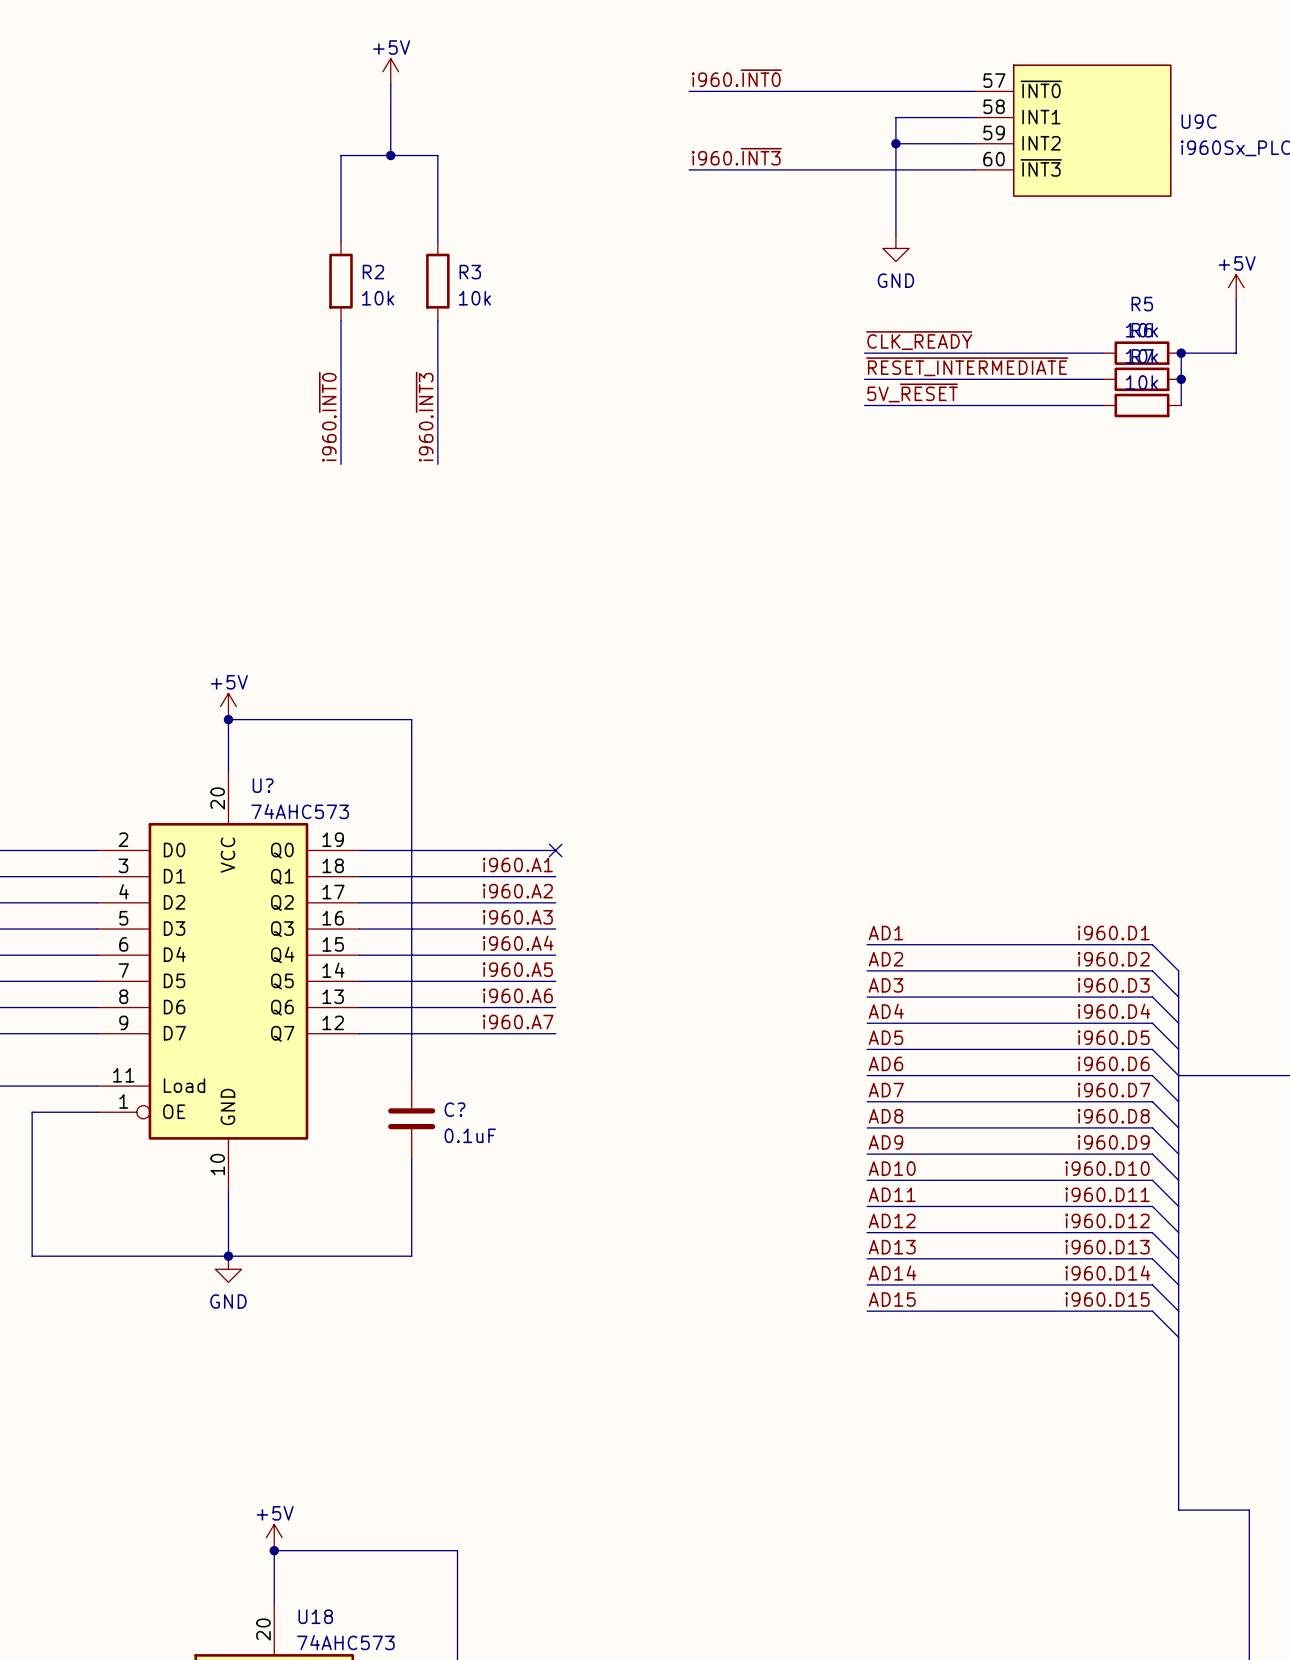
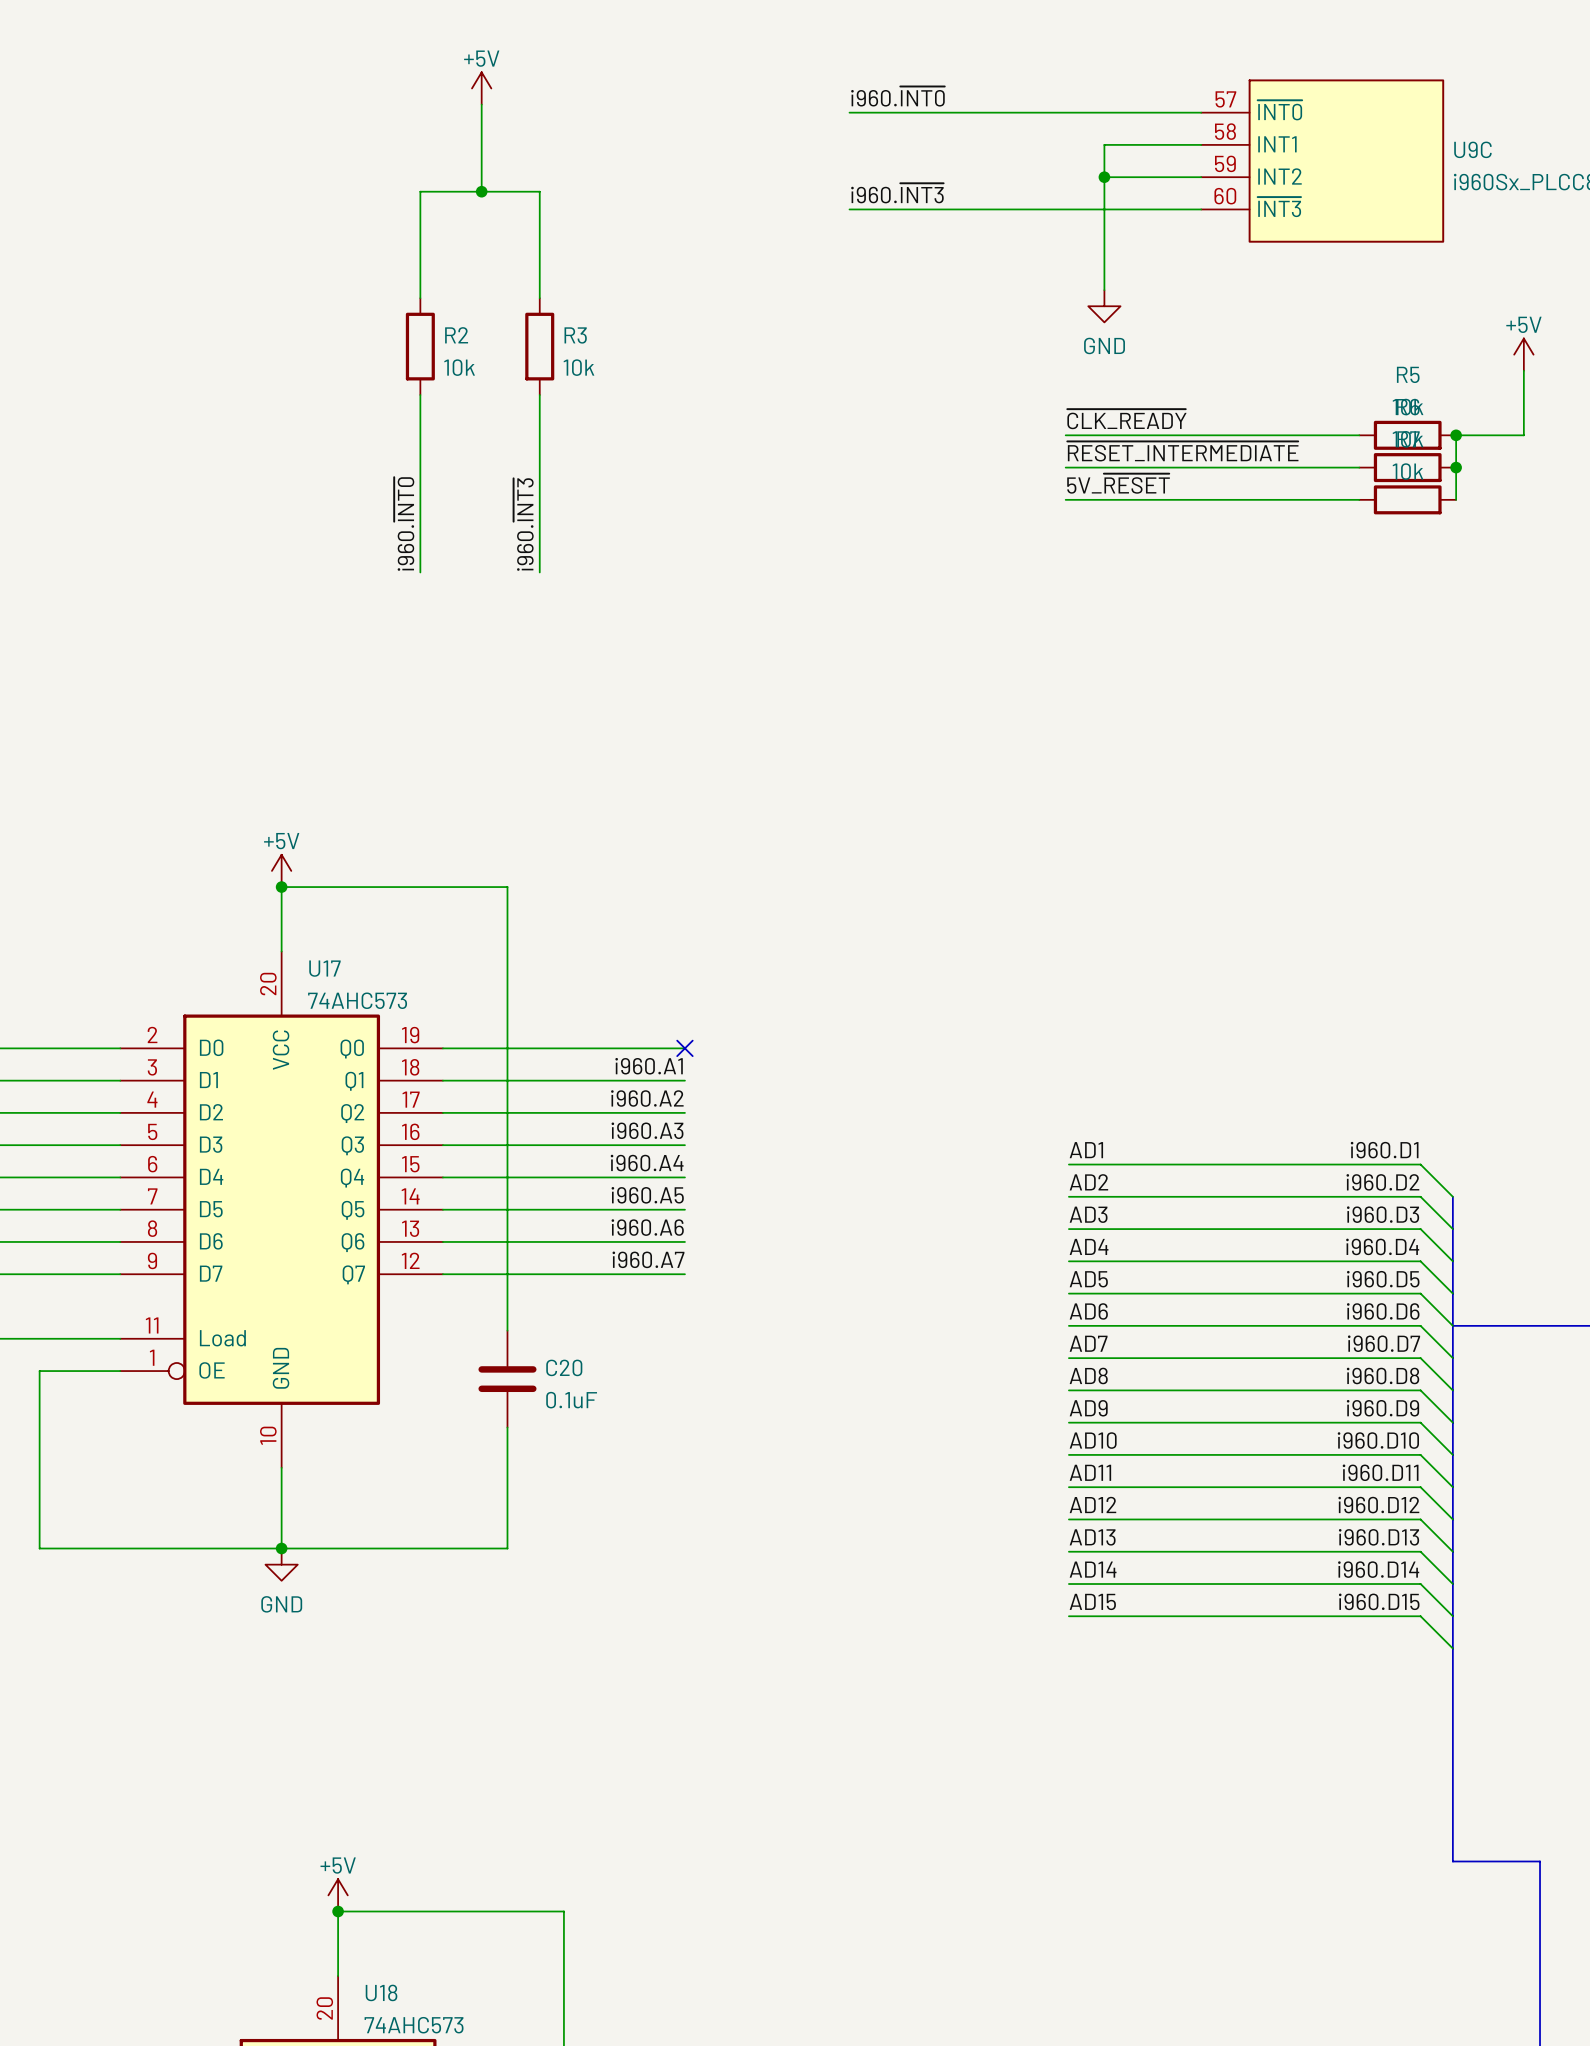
U? name: U? (263, 785) -> U17 (324, 968)
C? name: C? (454, 1109) -> C20 (564, 1367)

